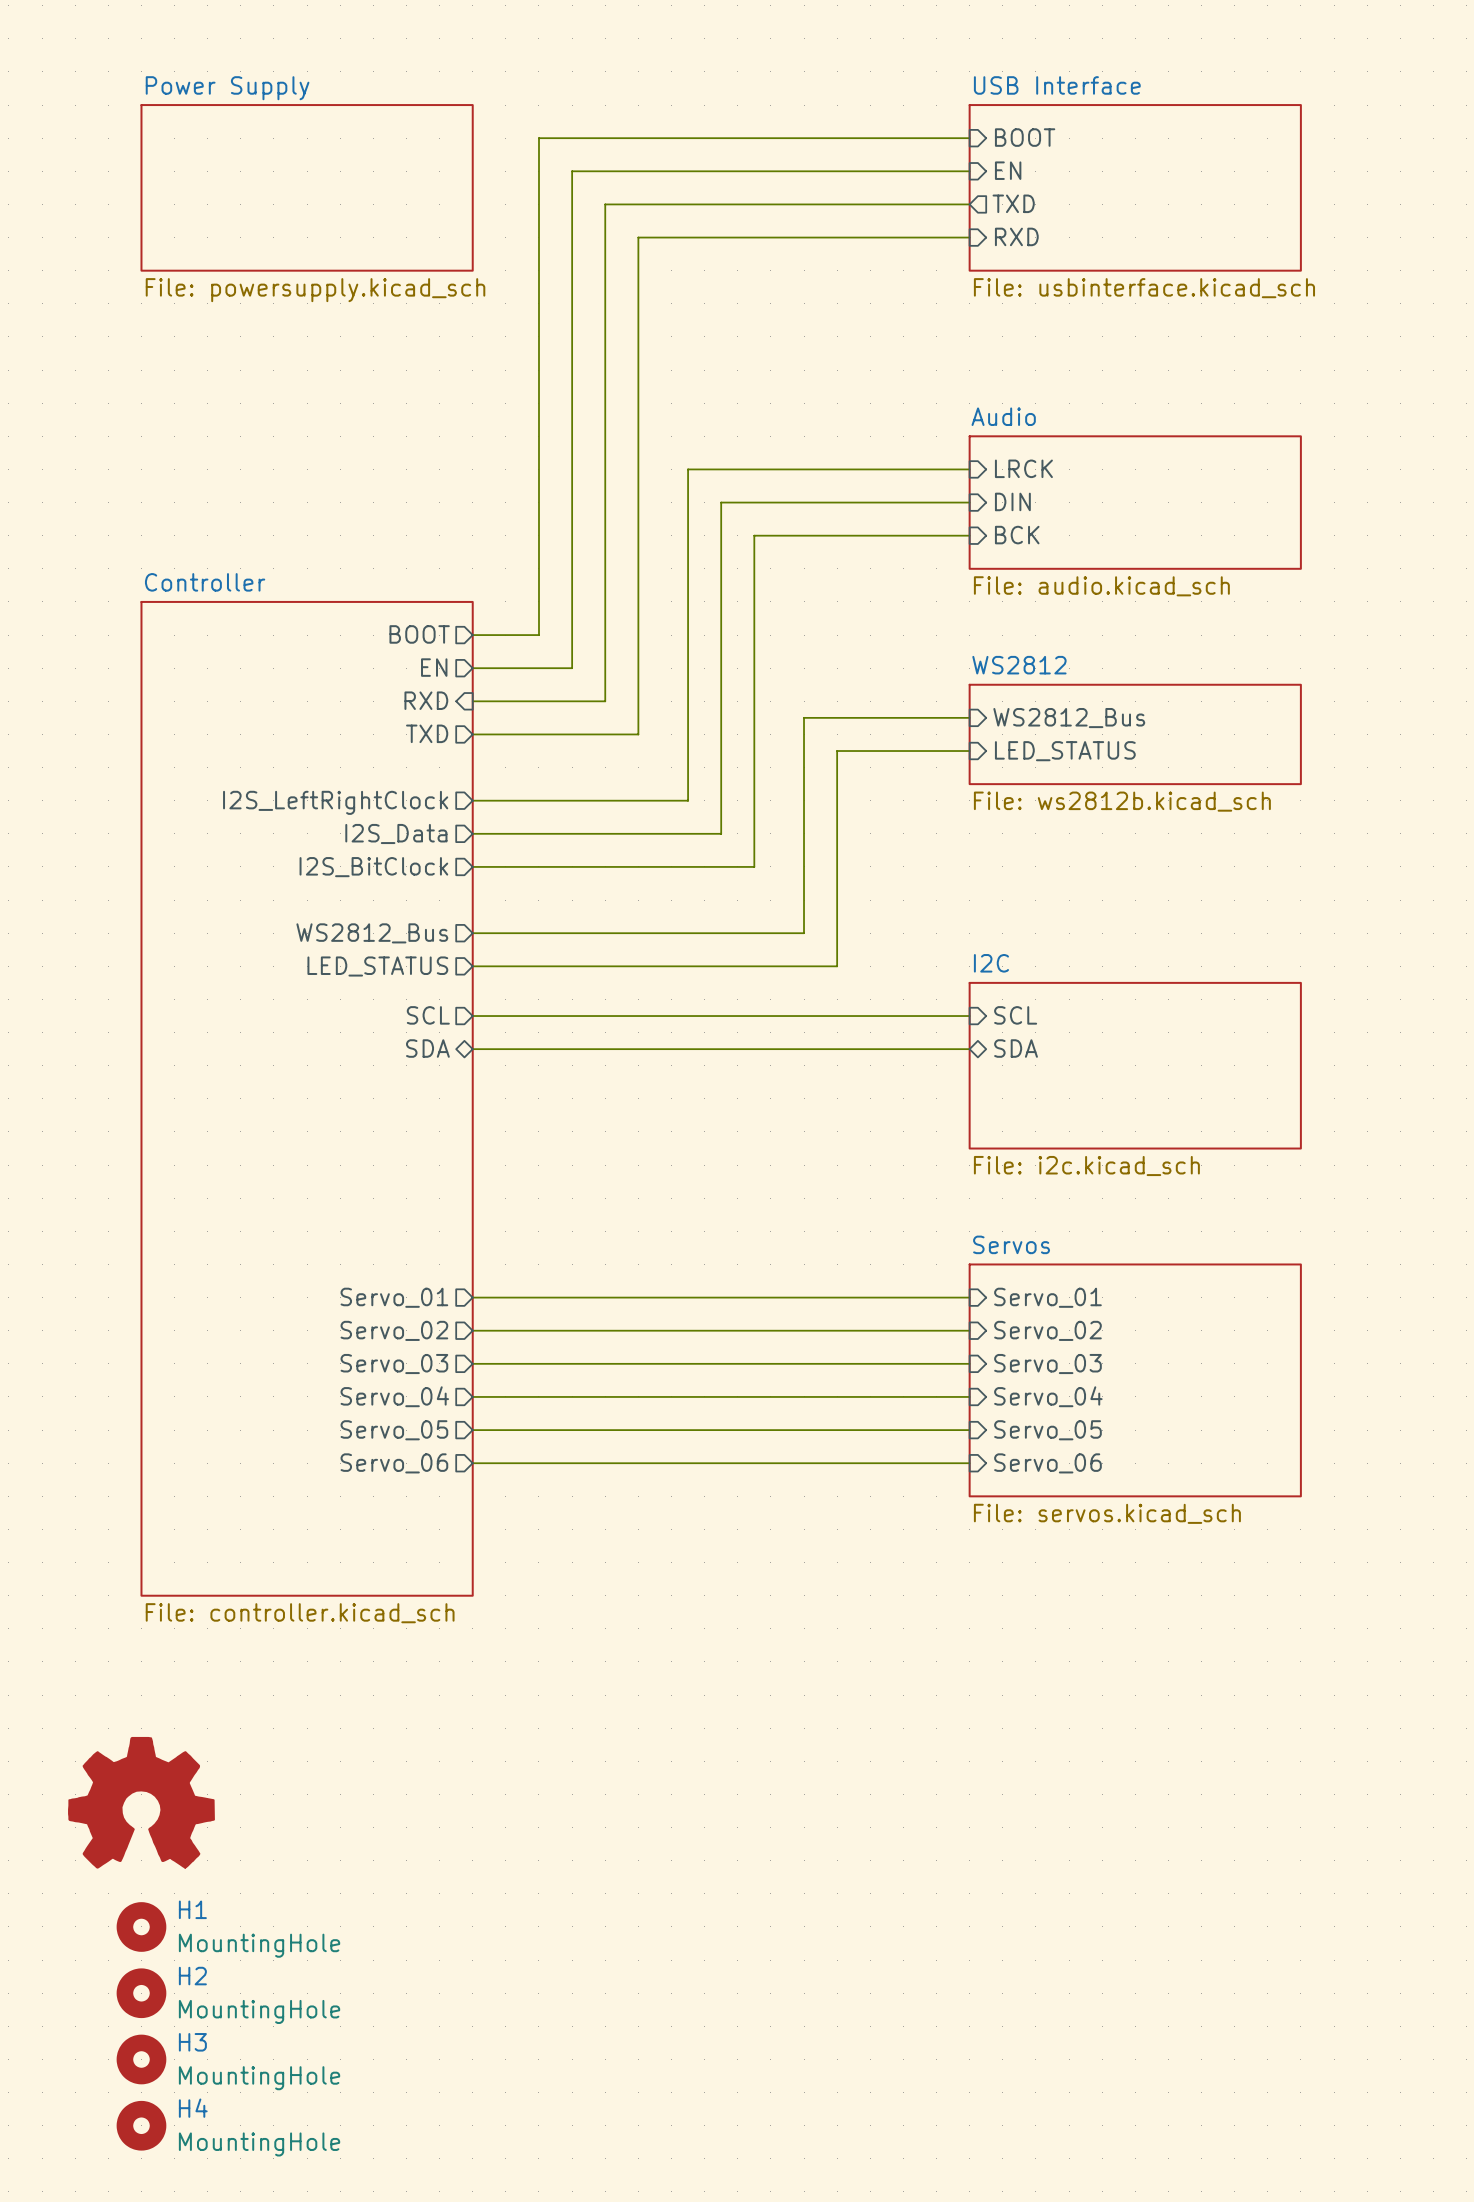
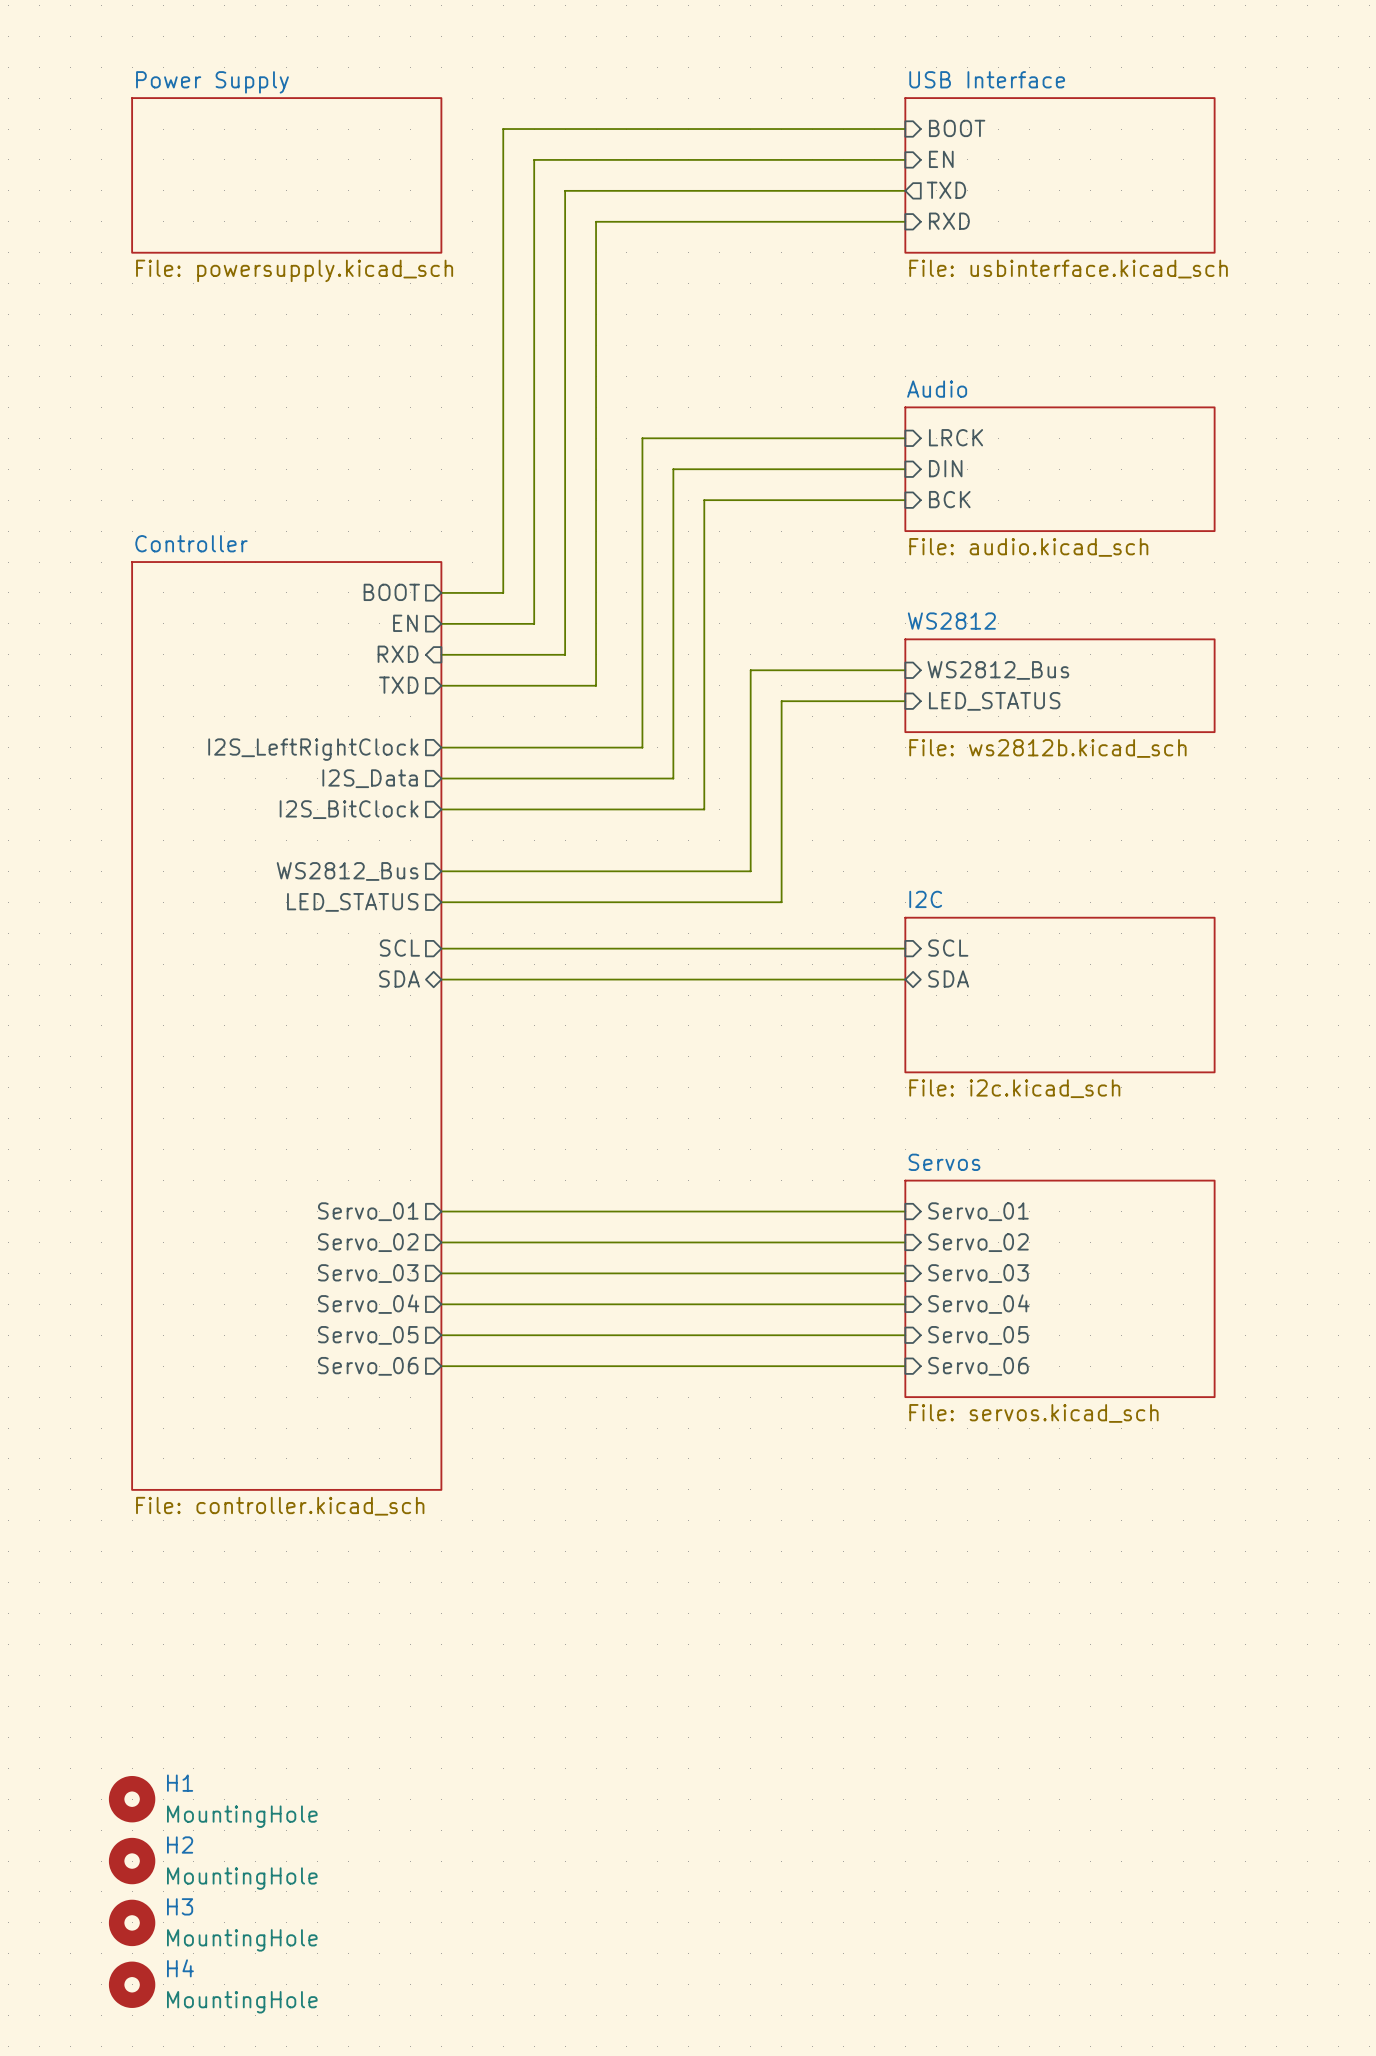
part: (141, 1802) -> none

